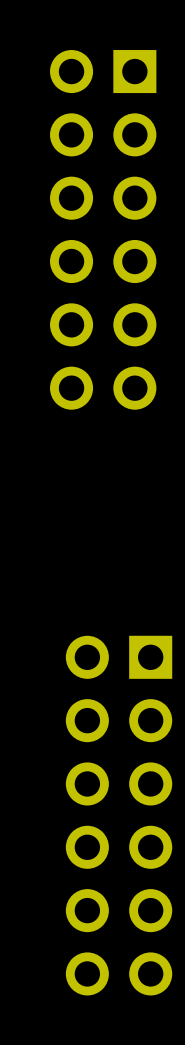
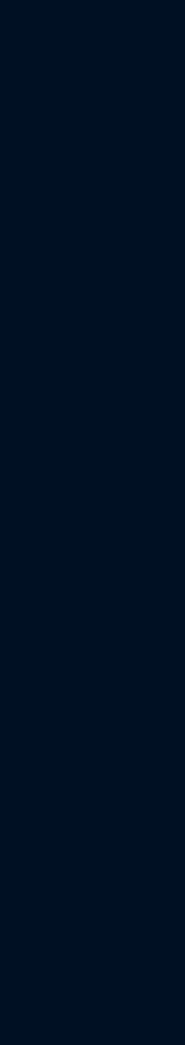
part: (103, 229) -> none
part: (119, 815) -> none

